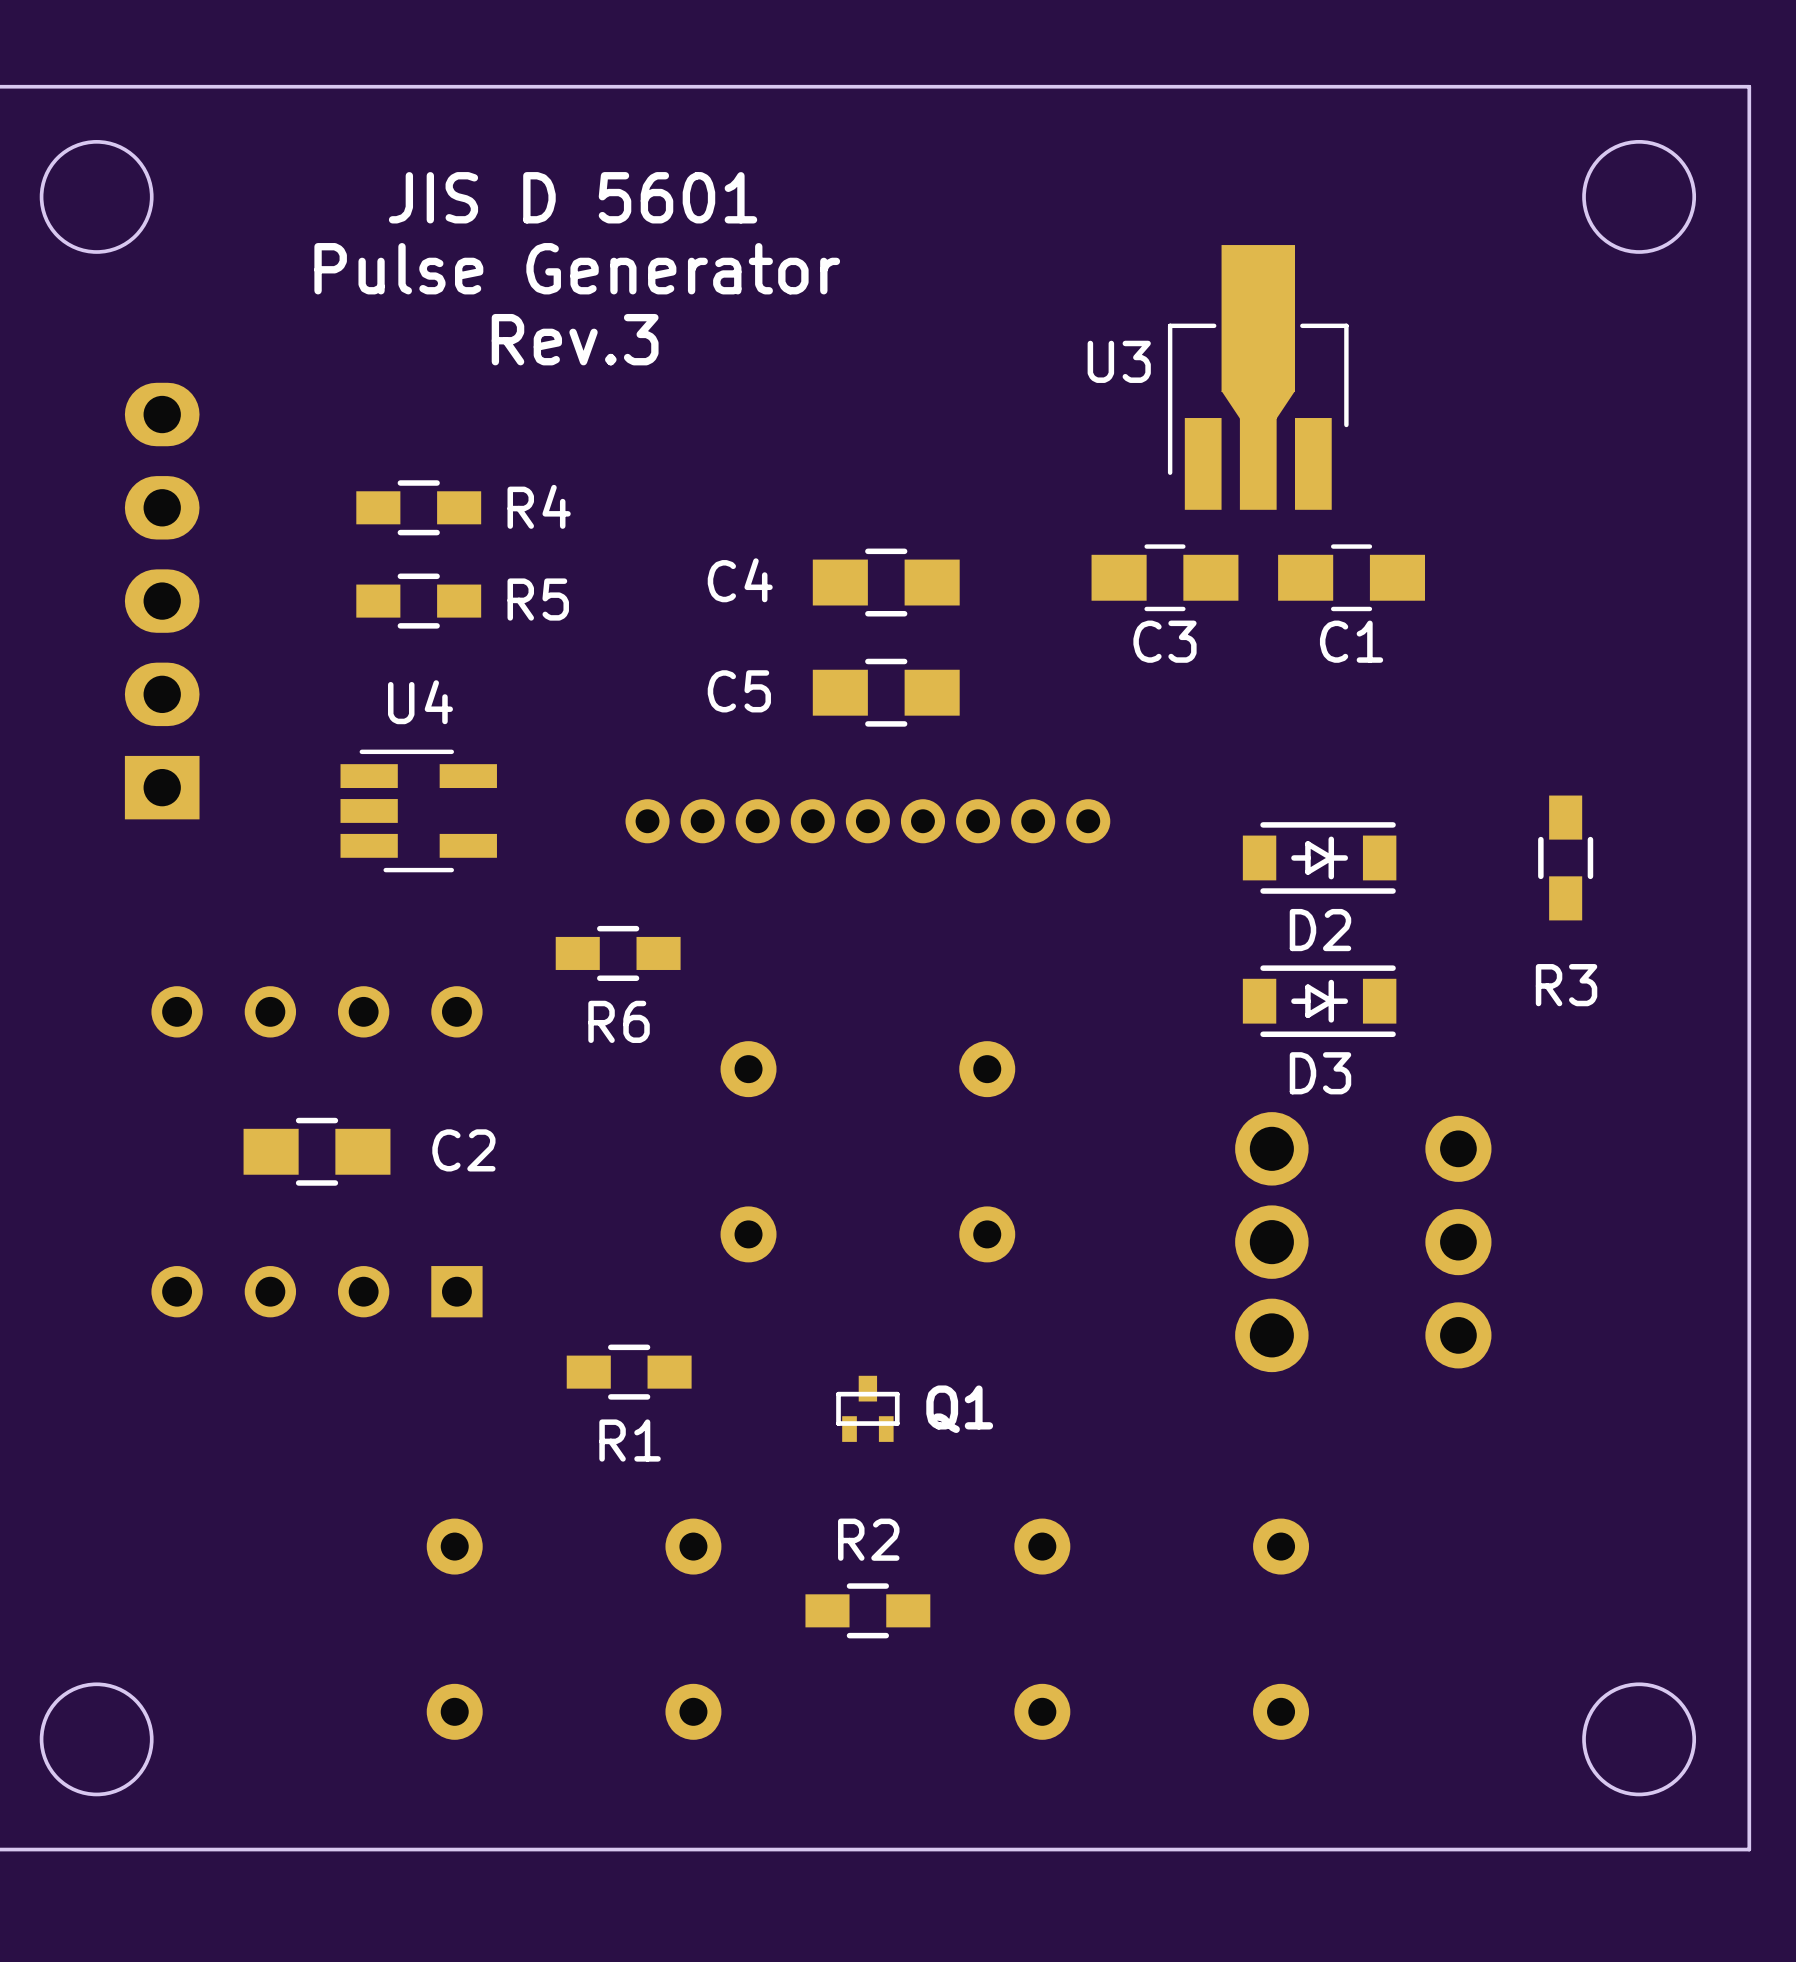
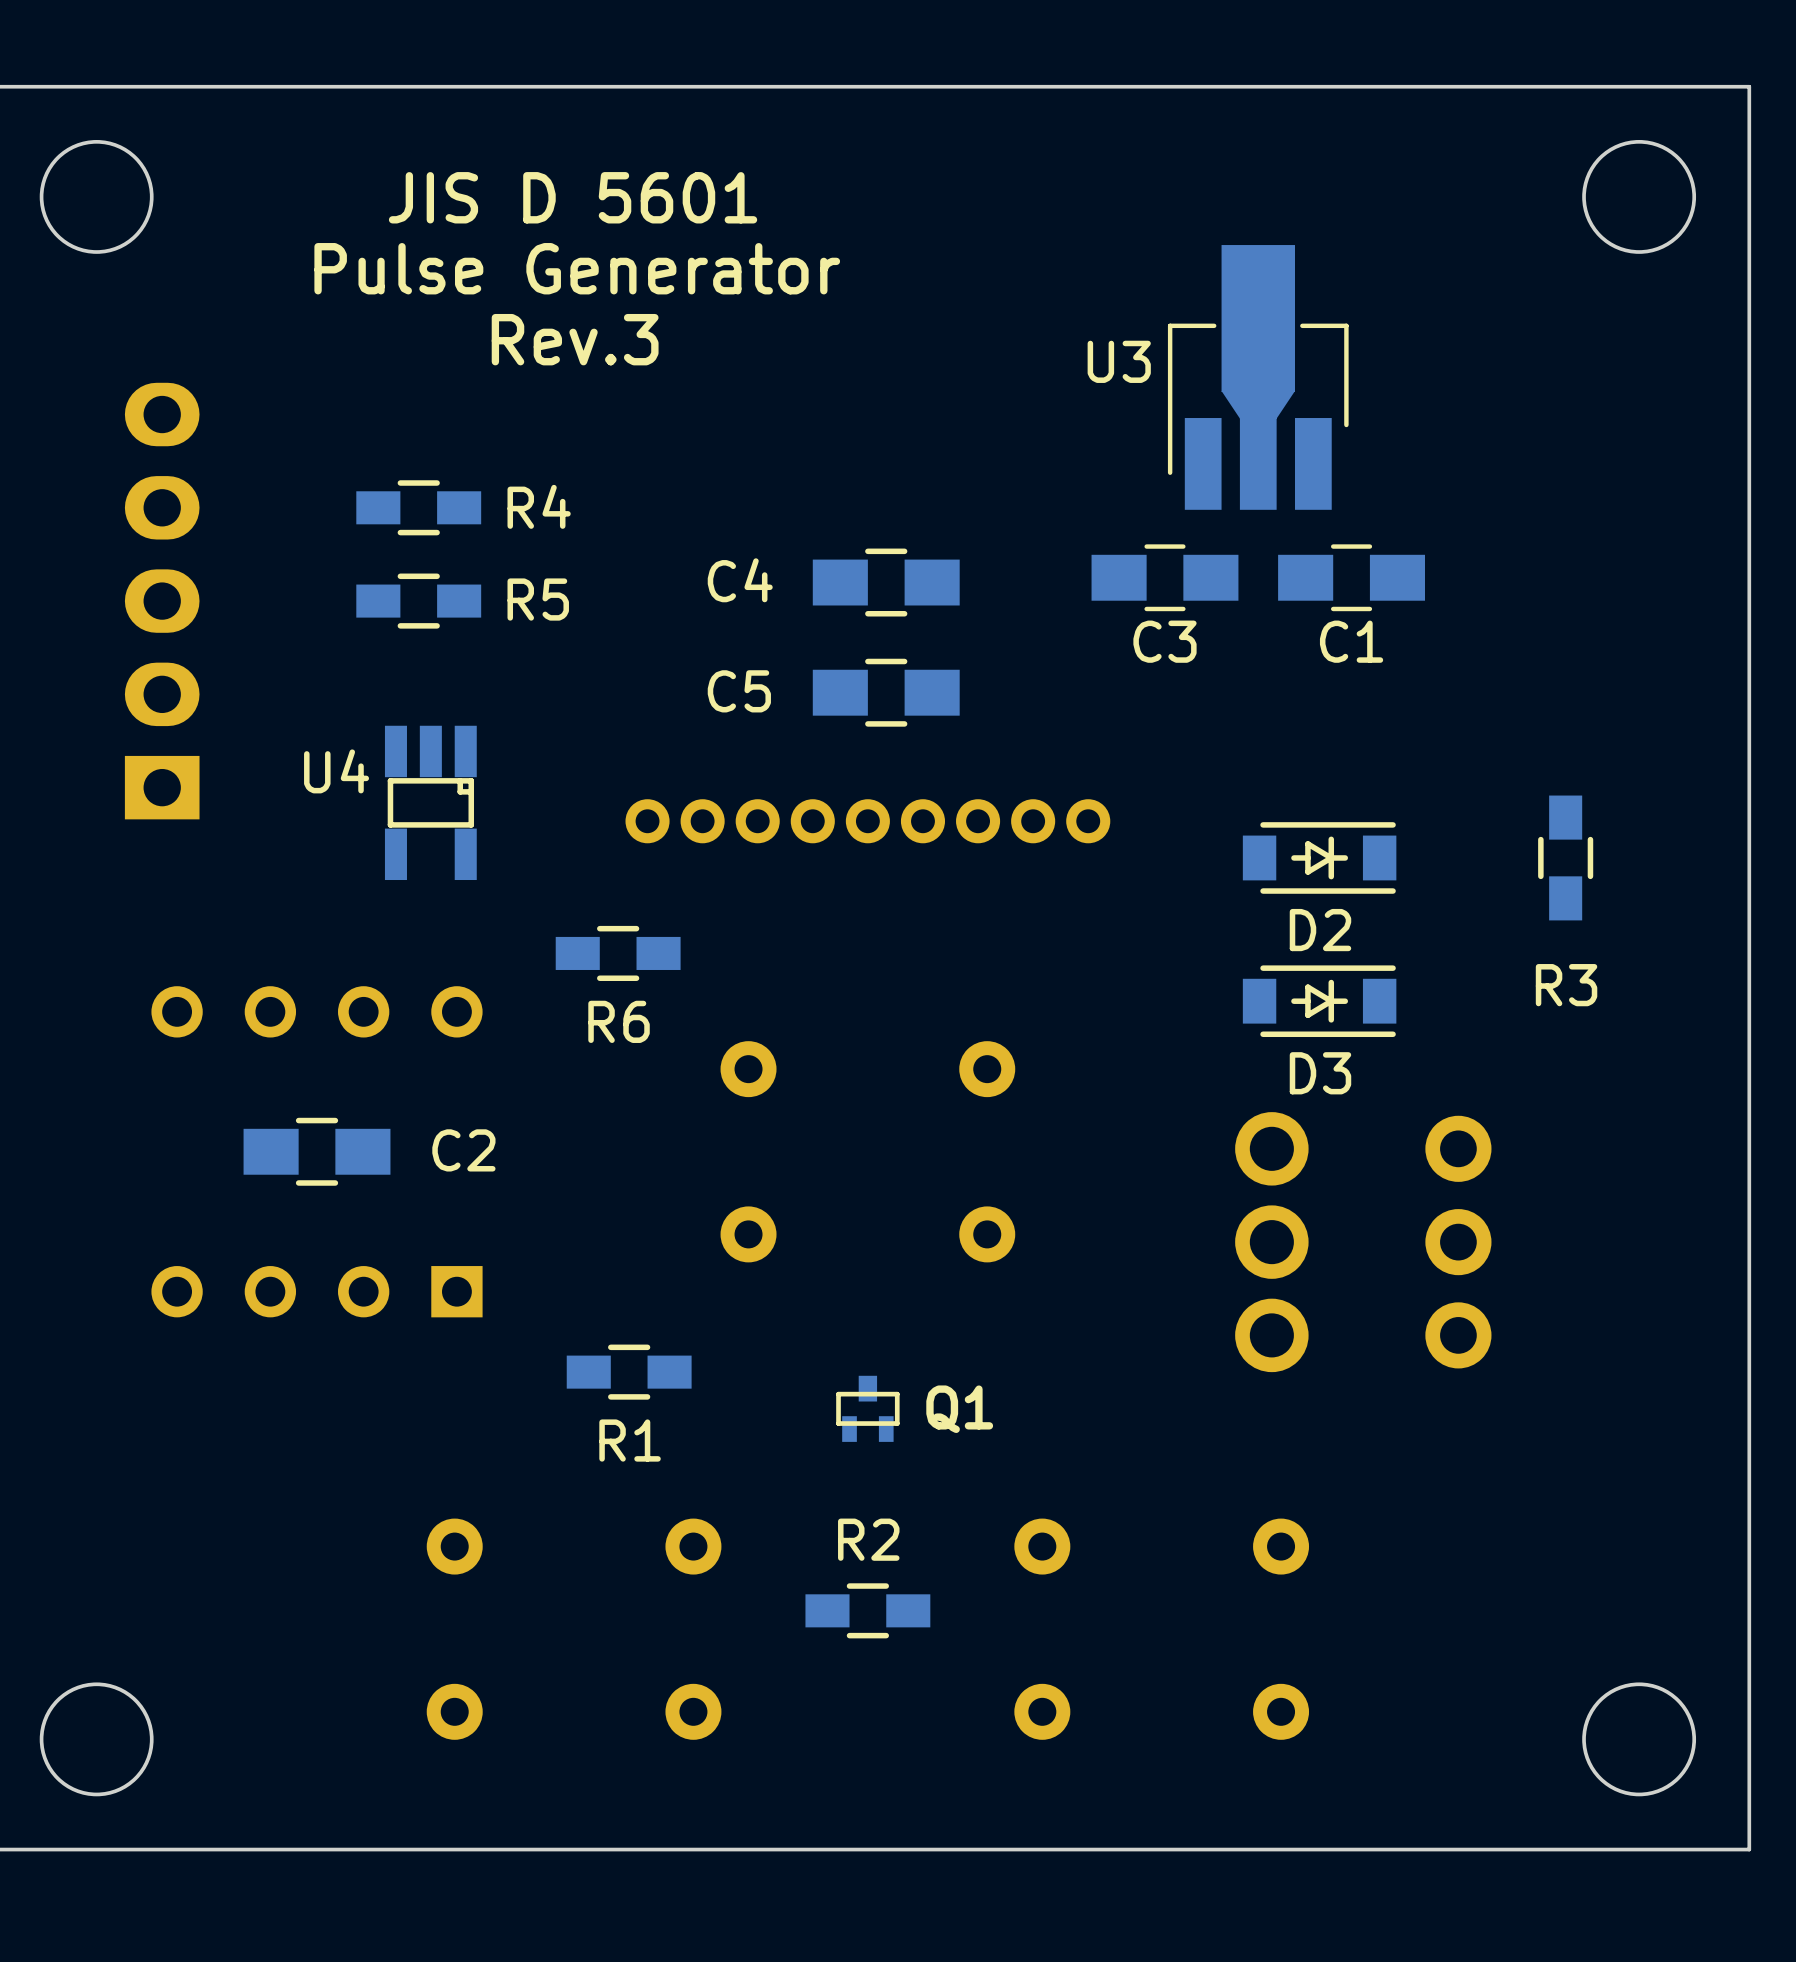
U4 name position: U4 (420, 702) -> U4 (336, 771)
U4 footprint: [340, 749, 497, 873] -> [384, 725, 477, 881]

